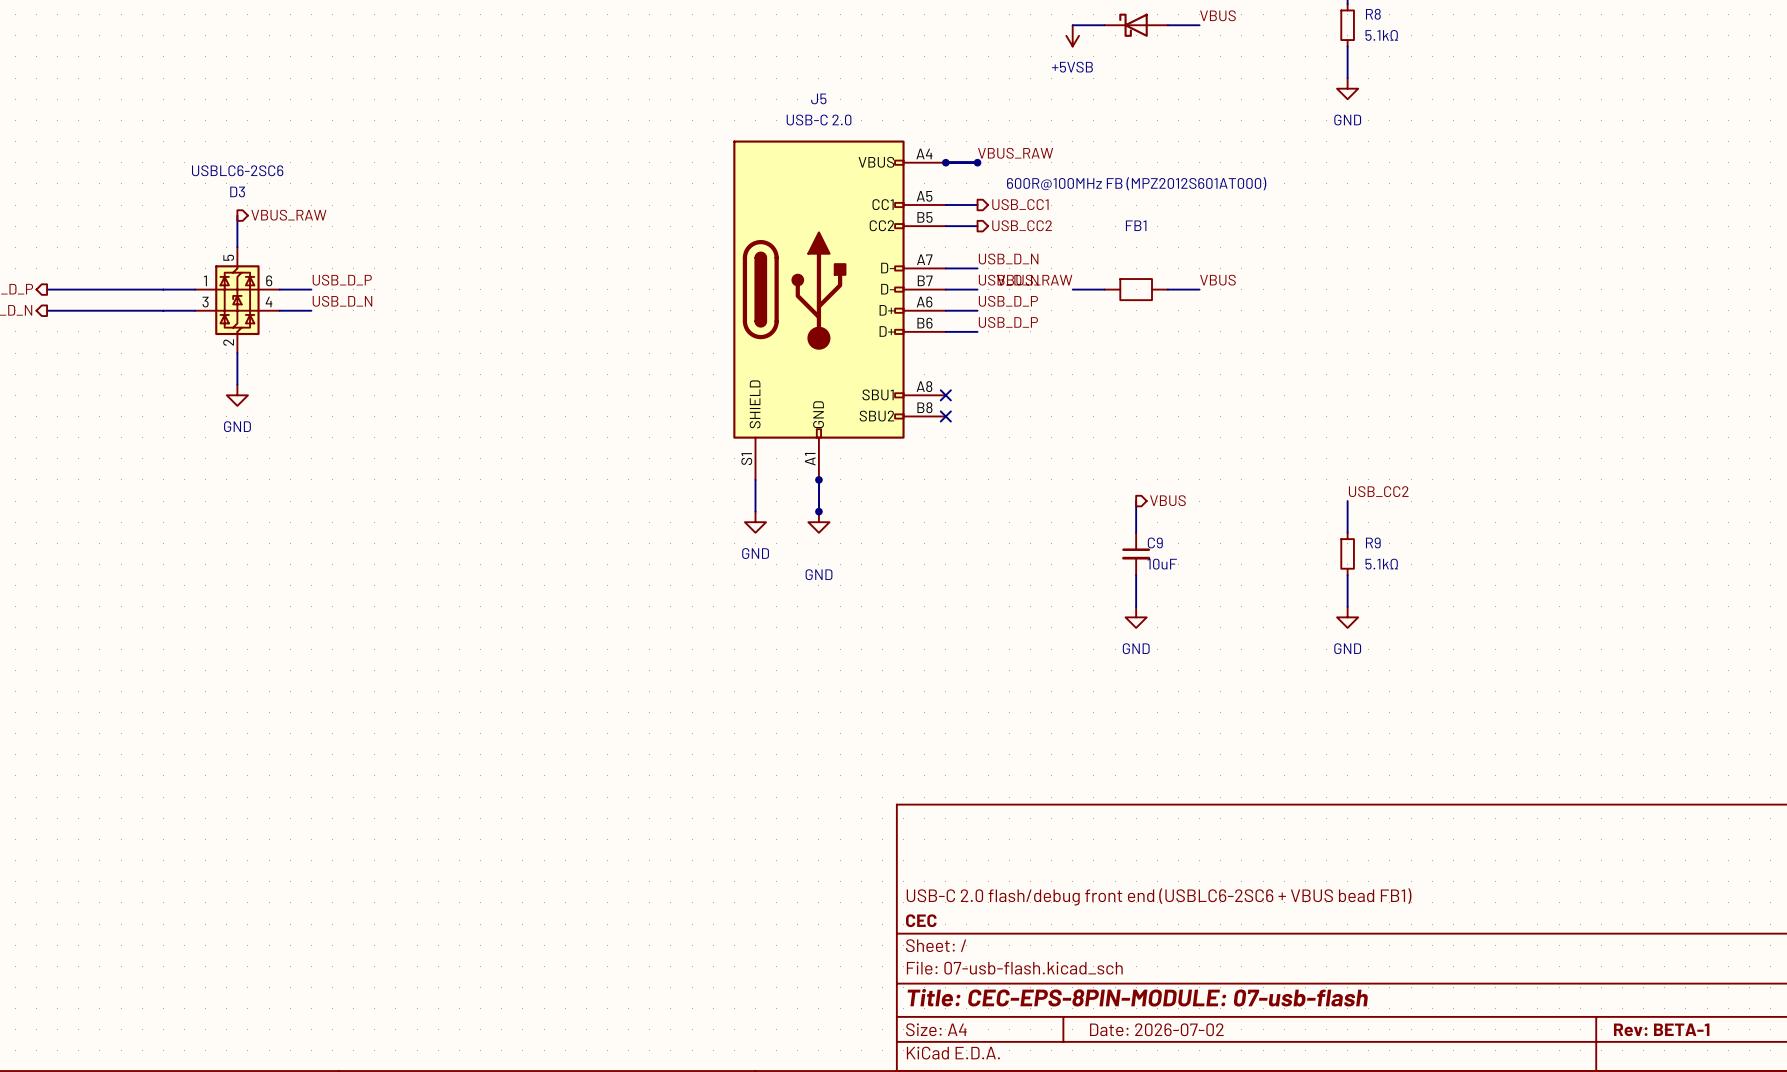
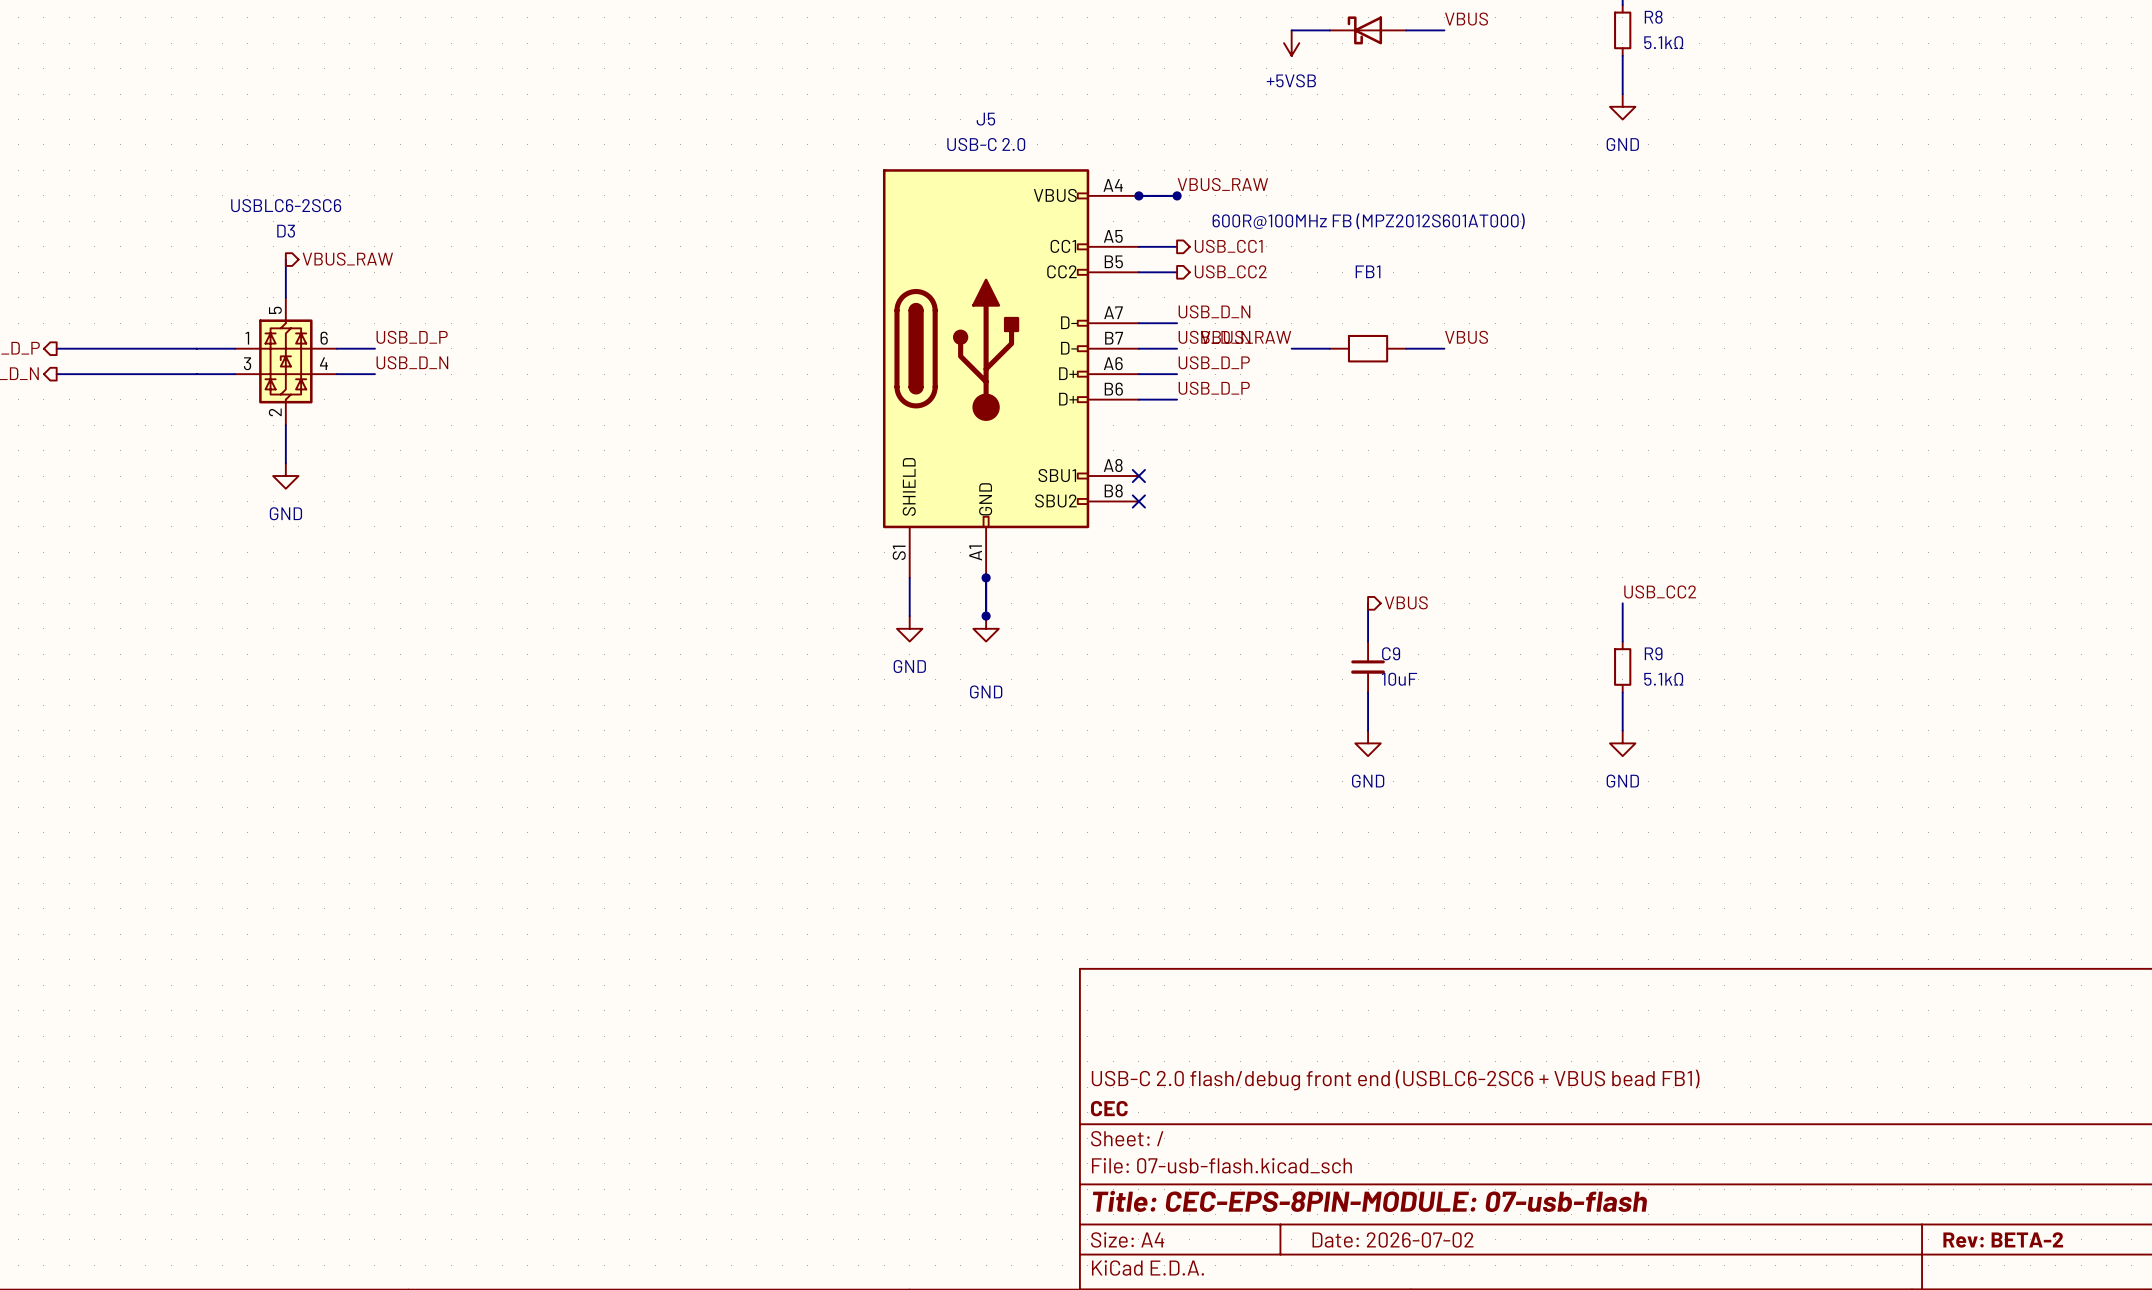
title block: Rev: BETA-1 (1661, 1029) -> Rev: BETA-2 (2003, 1239)

